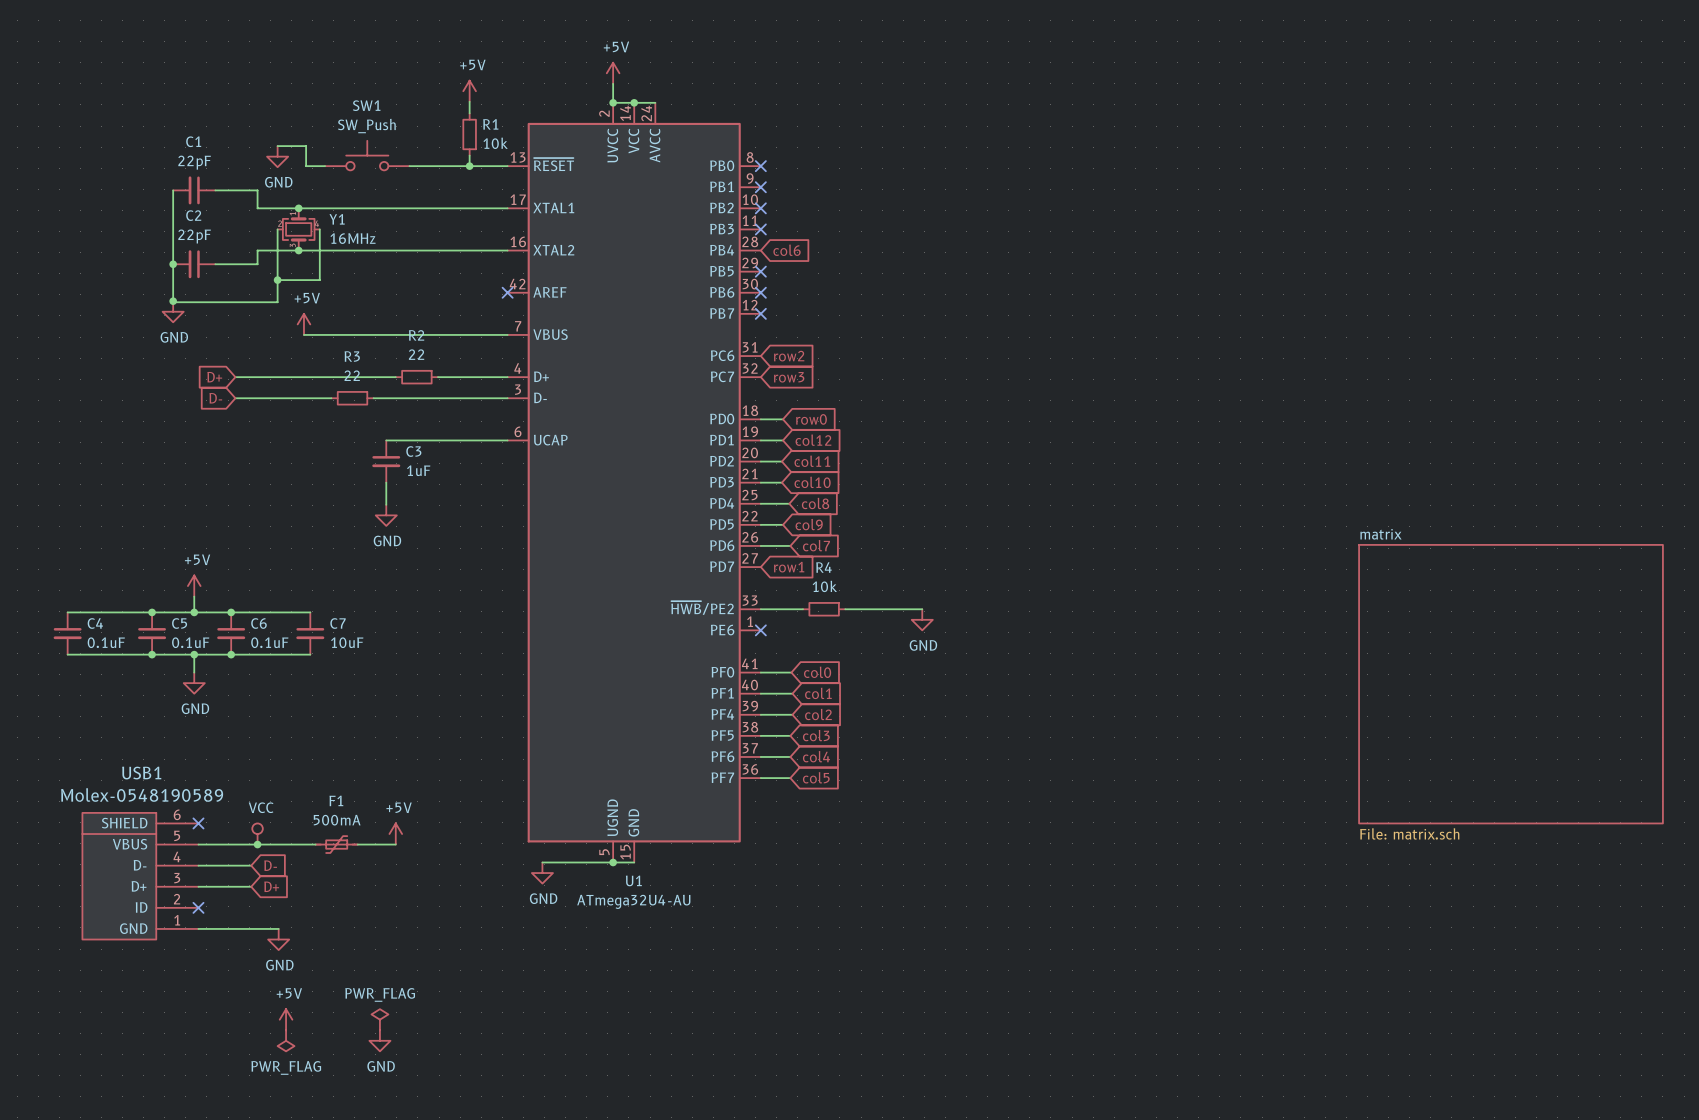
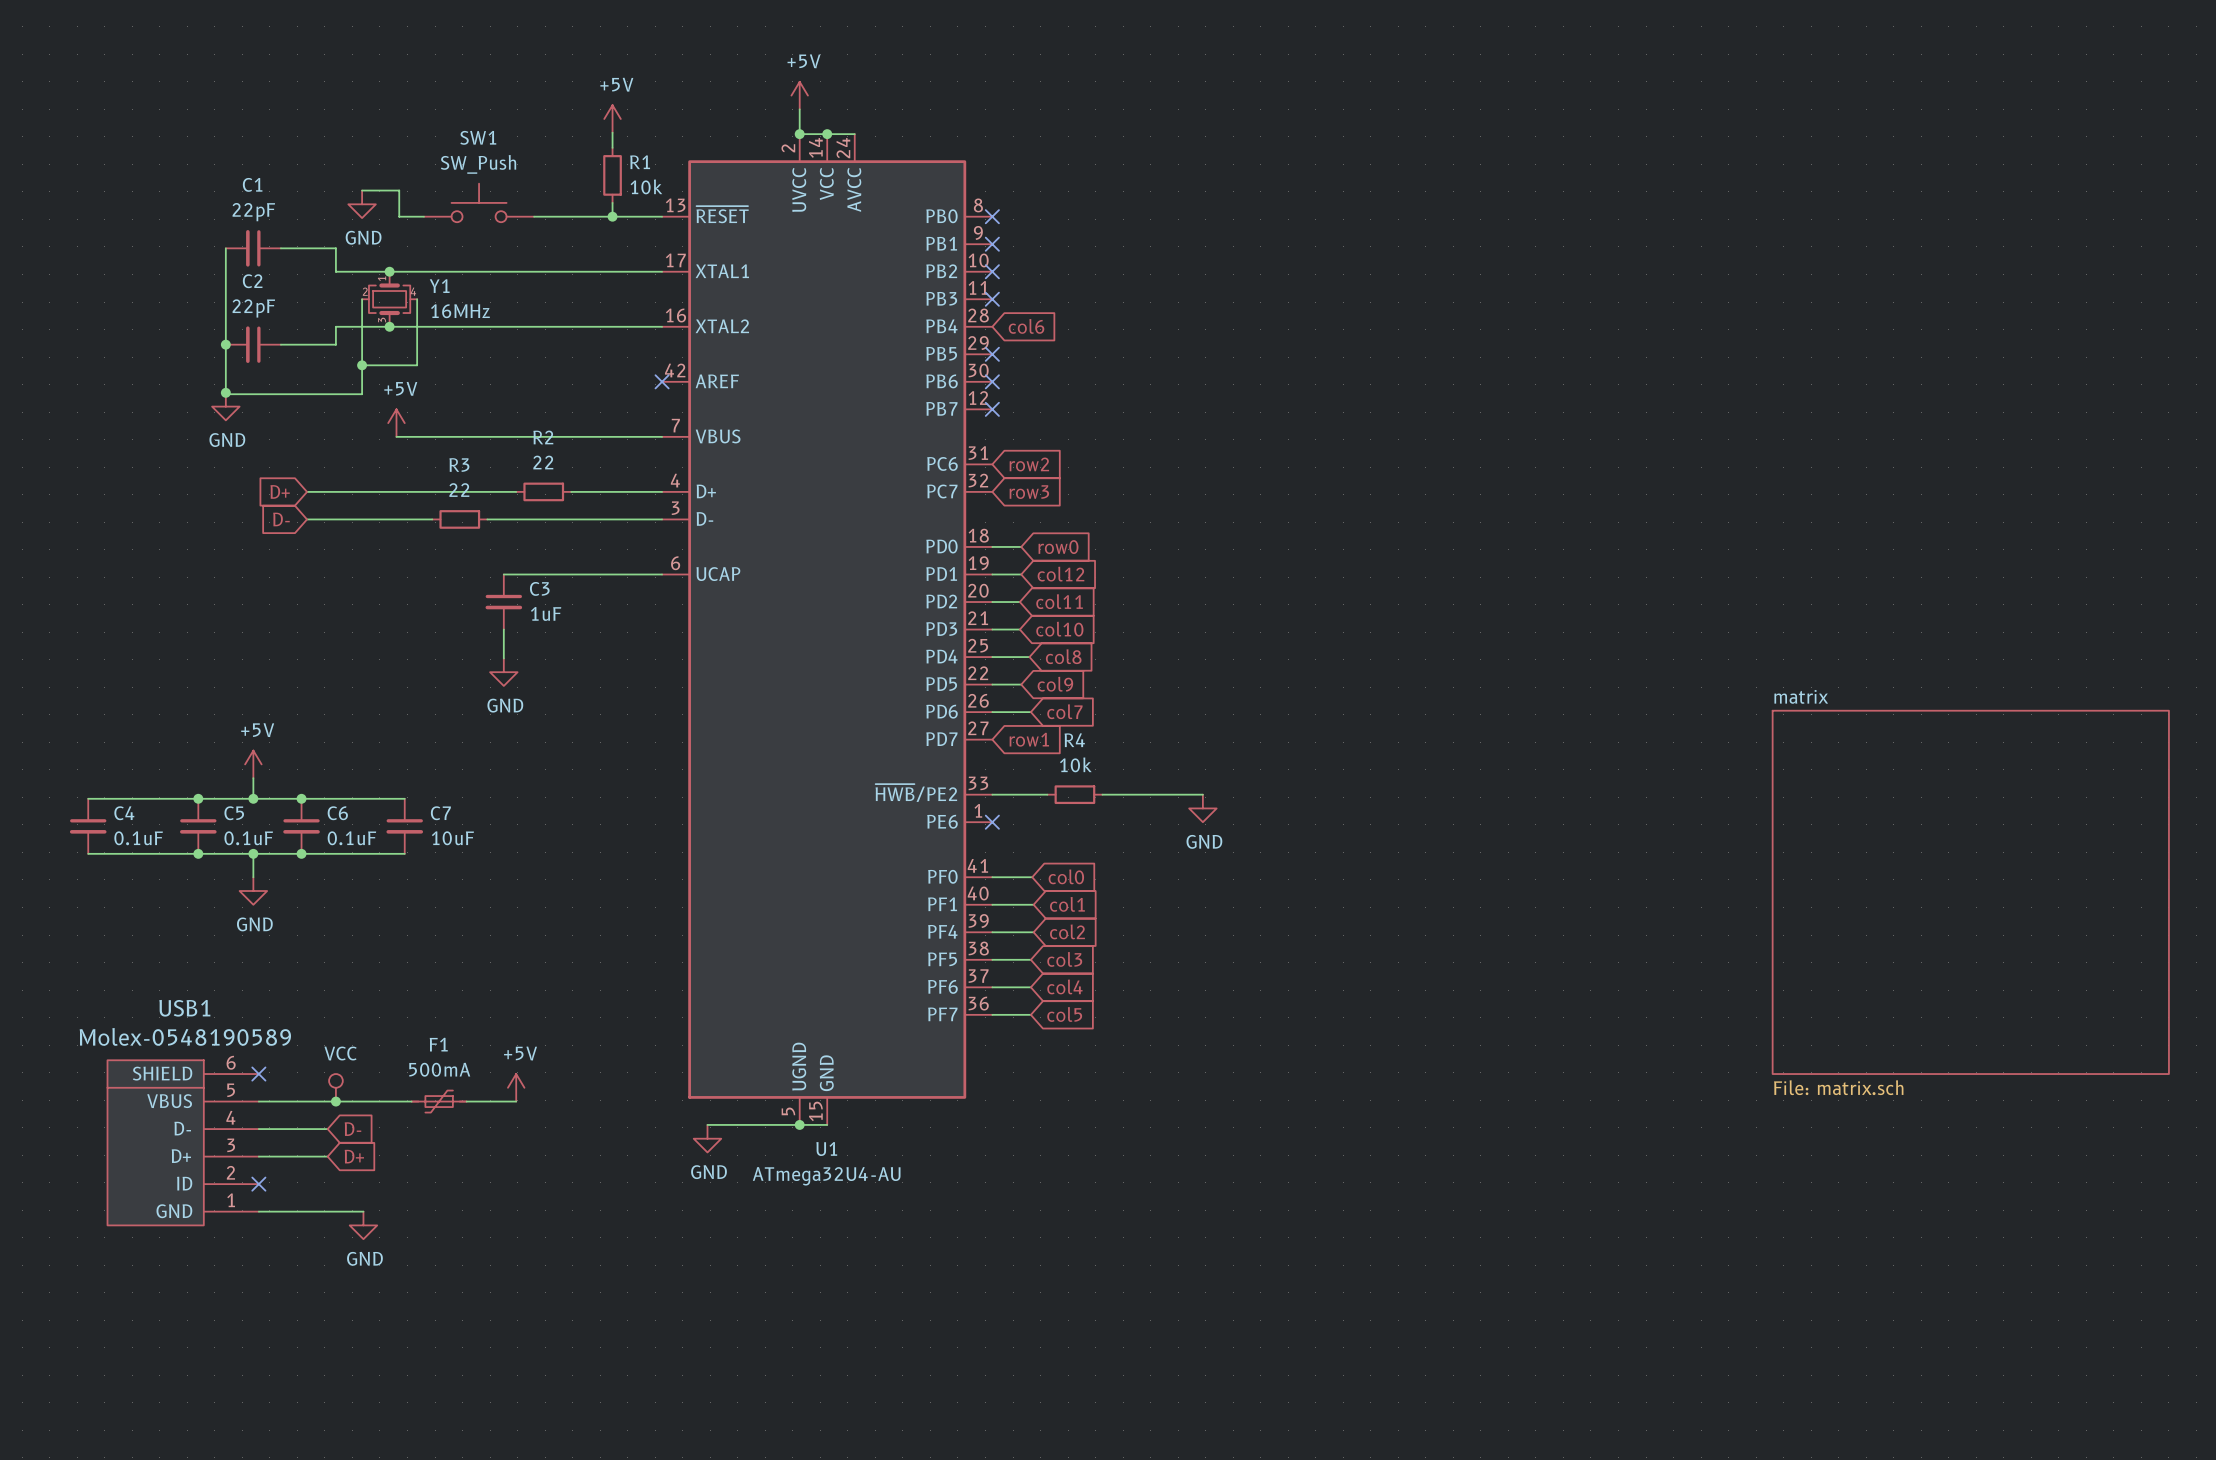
power symbol: +5V (286, 1019) -> none
power symbol: PWR_FLAG (379, 1019) -> none
power symbol: PWR_FLAG (286, 1040) -> none
power symbol: GND (379, 1040) -> none

